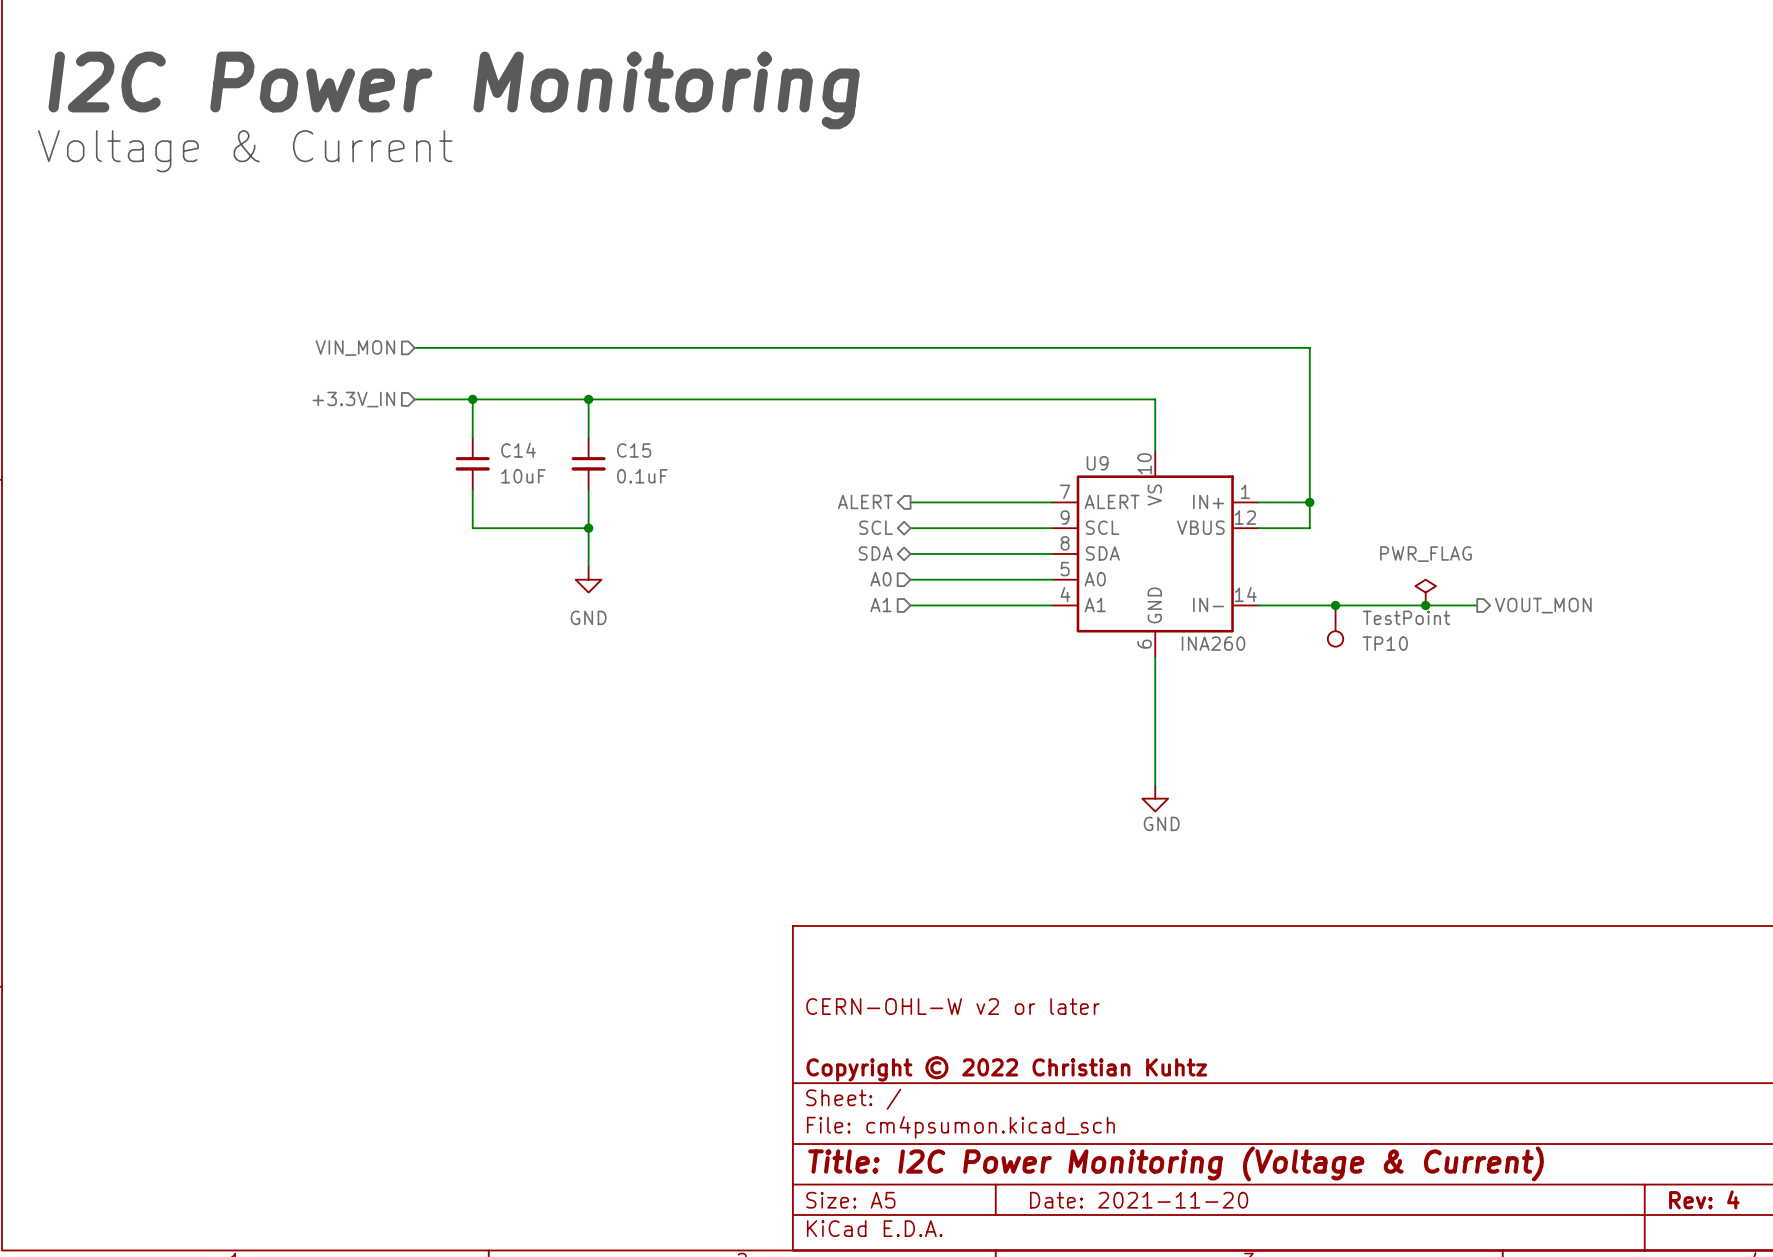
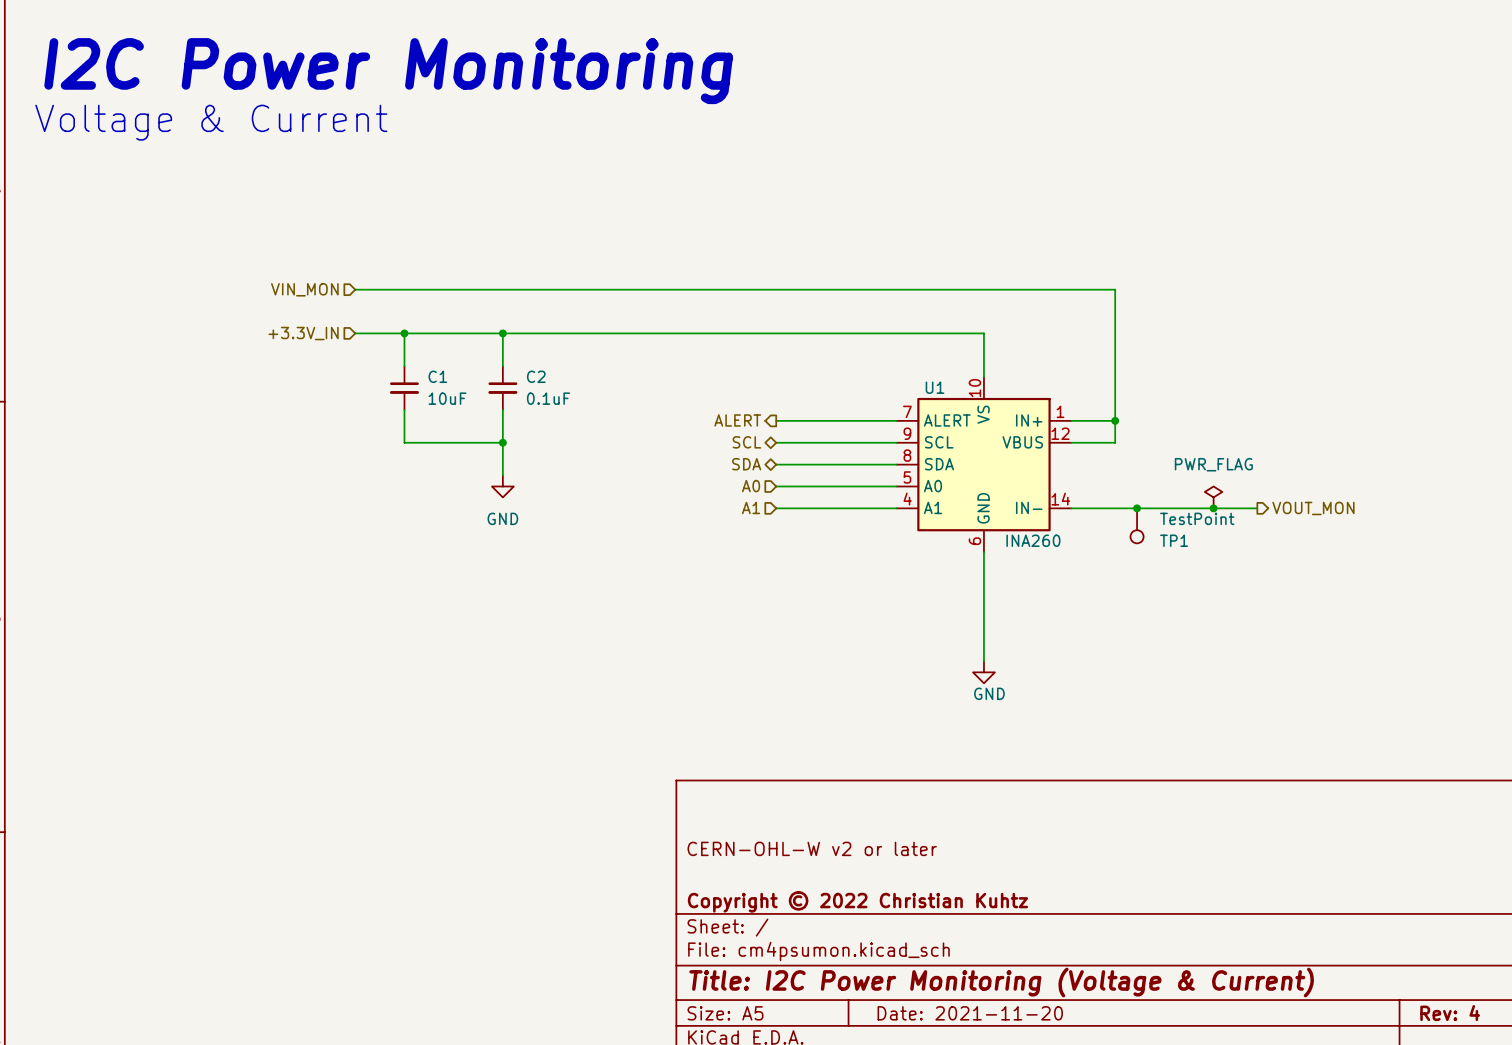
C14 name: C14 (518, 450) -> C1 (437, 376)
C15 name: C15 (634, 450) -> C2 (536, 376)
U9 name: U9 (1097, 463) -> U1 (935, 387)
TP10 name: TP10 (1385, 643) -> TP1 (1174, 540)

